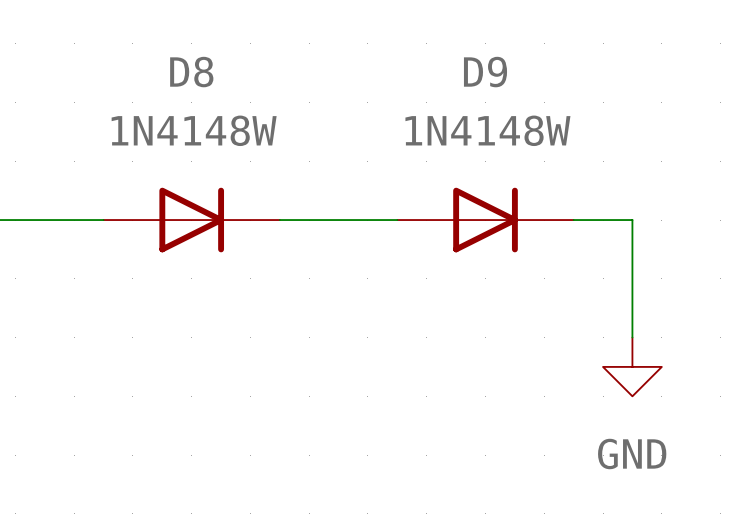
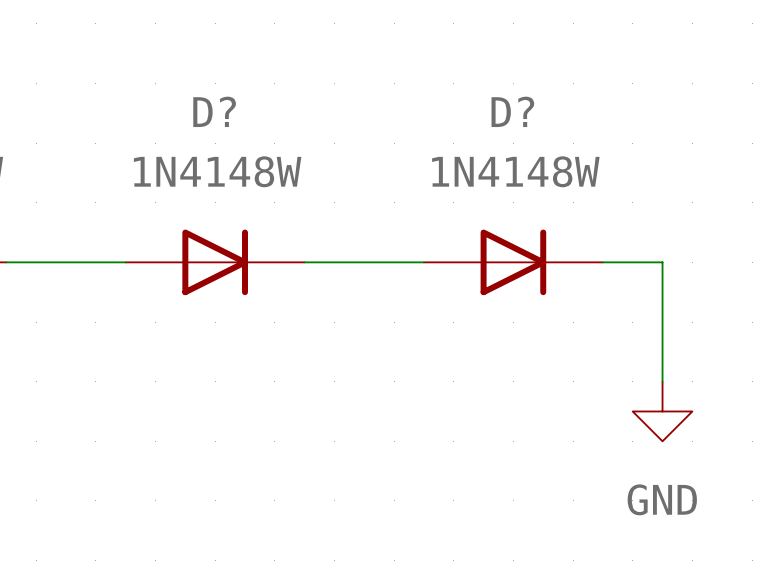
D8 name: D8 (191, 72) -> D? (214, 111)
D9 name: D9 (485, 72) -> D? (512, 111)

